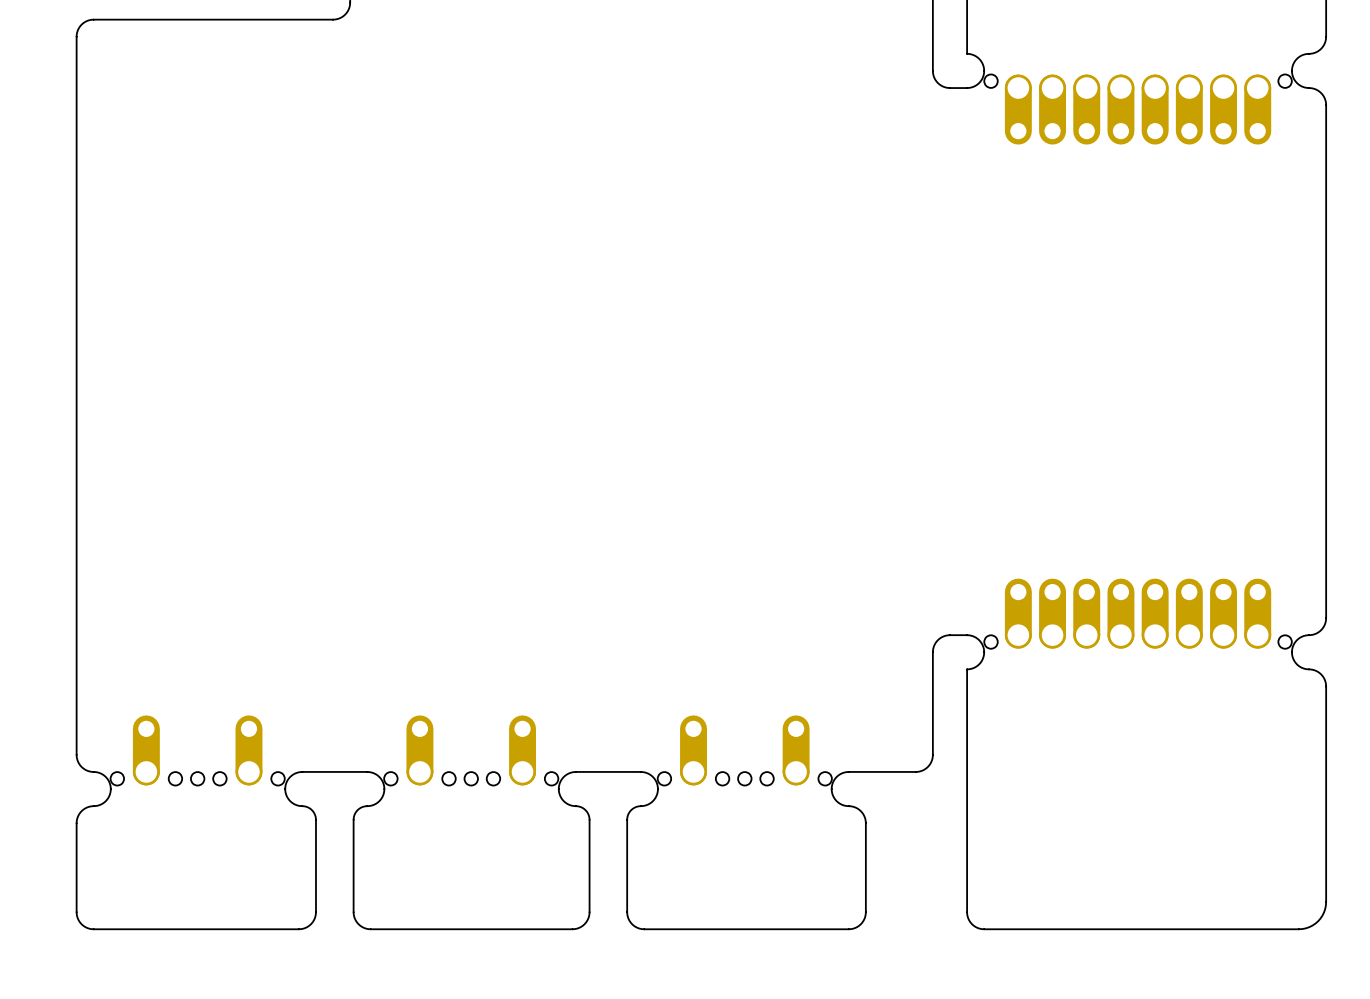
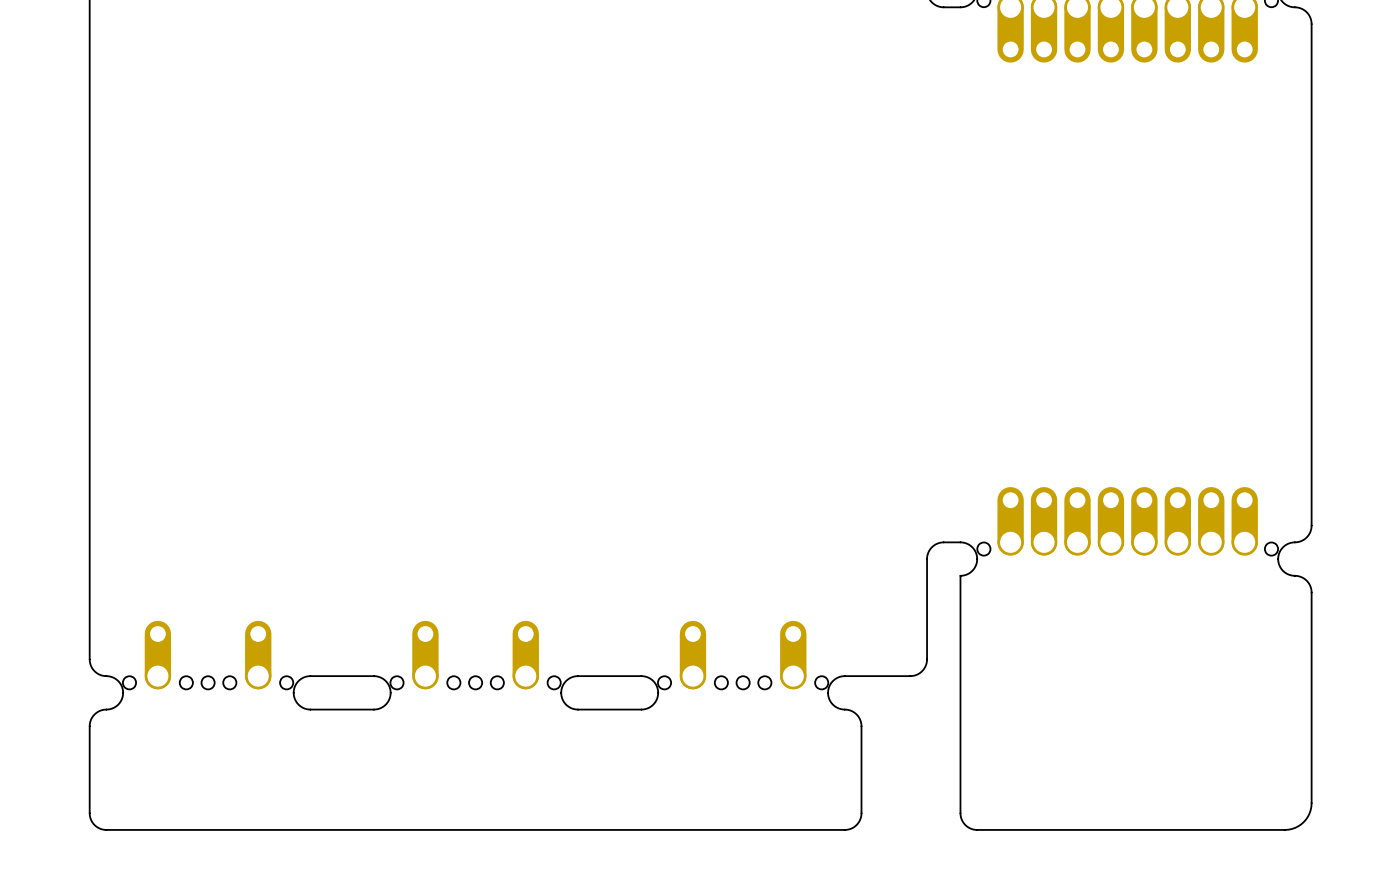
board edge: (302, 806) (310, 808) (315, 818) (315, 912) (310, 924) (298, 929) -> (377, 829) (307, 829)
board edge: (367, 806) (357, 810) (353, 818) (353, 912) (358, 924) (370, 929) -> (373, 709) (310, 709)
board edge: (575, 806) (584, 808) (589, 818) (589, 912) (584, 924) (572, 929) -> (644, 829) (574, 829)
board edge: (640, 806) (631, 810) (627, 818) (627, 912) (632, 924) (644, 929) -> (641, 709) (577, 709)

